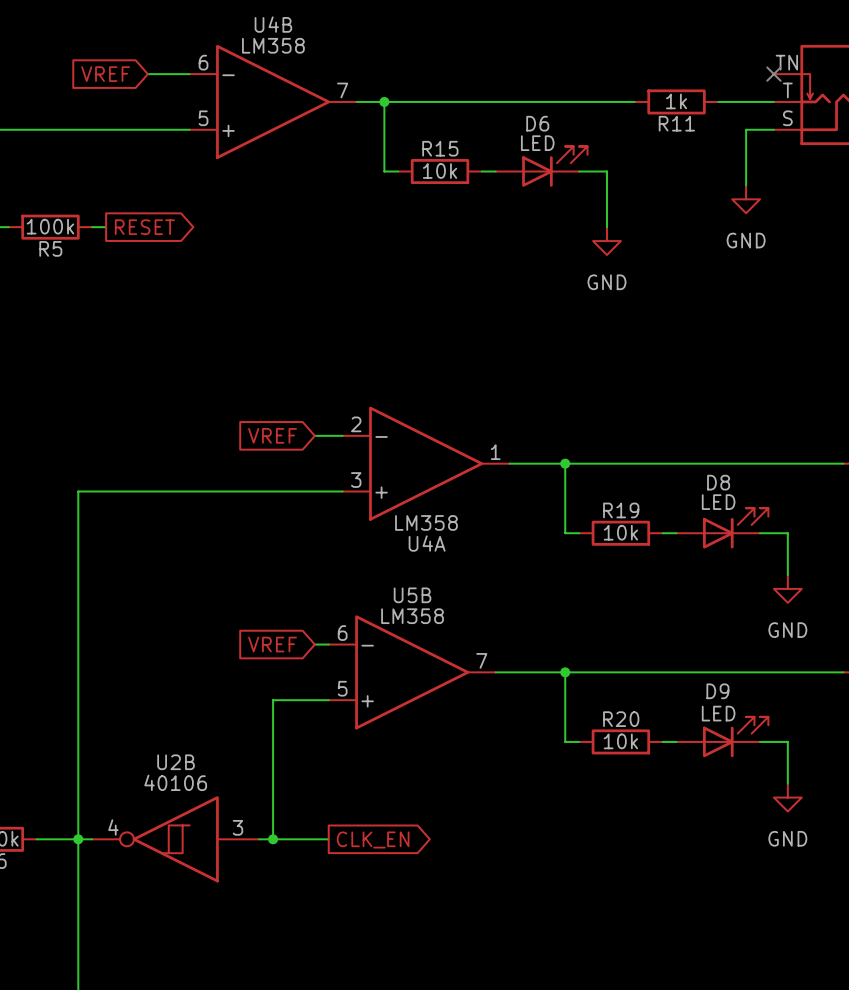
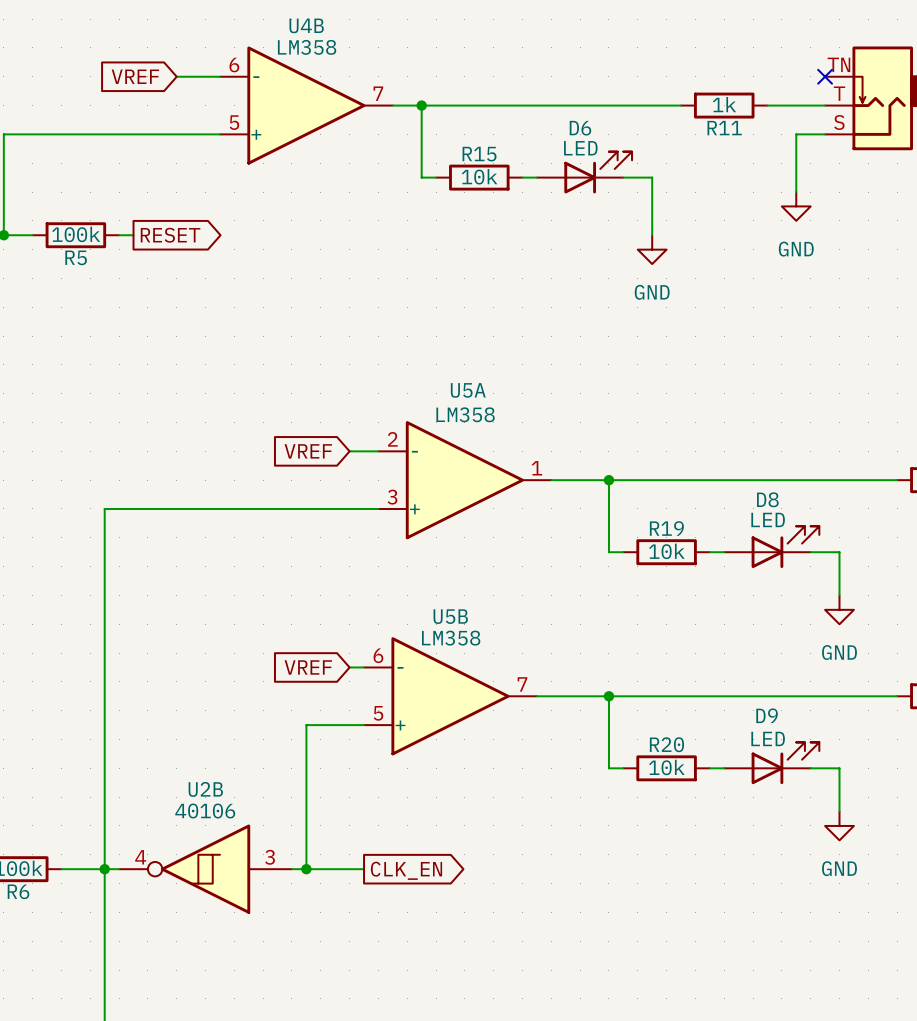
U4A value position: LM358 (426, 522) -> LM358 (465, 414)
U4A name: U4A (427, 543) -> U5A (468, 390)

